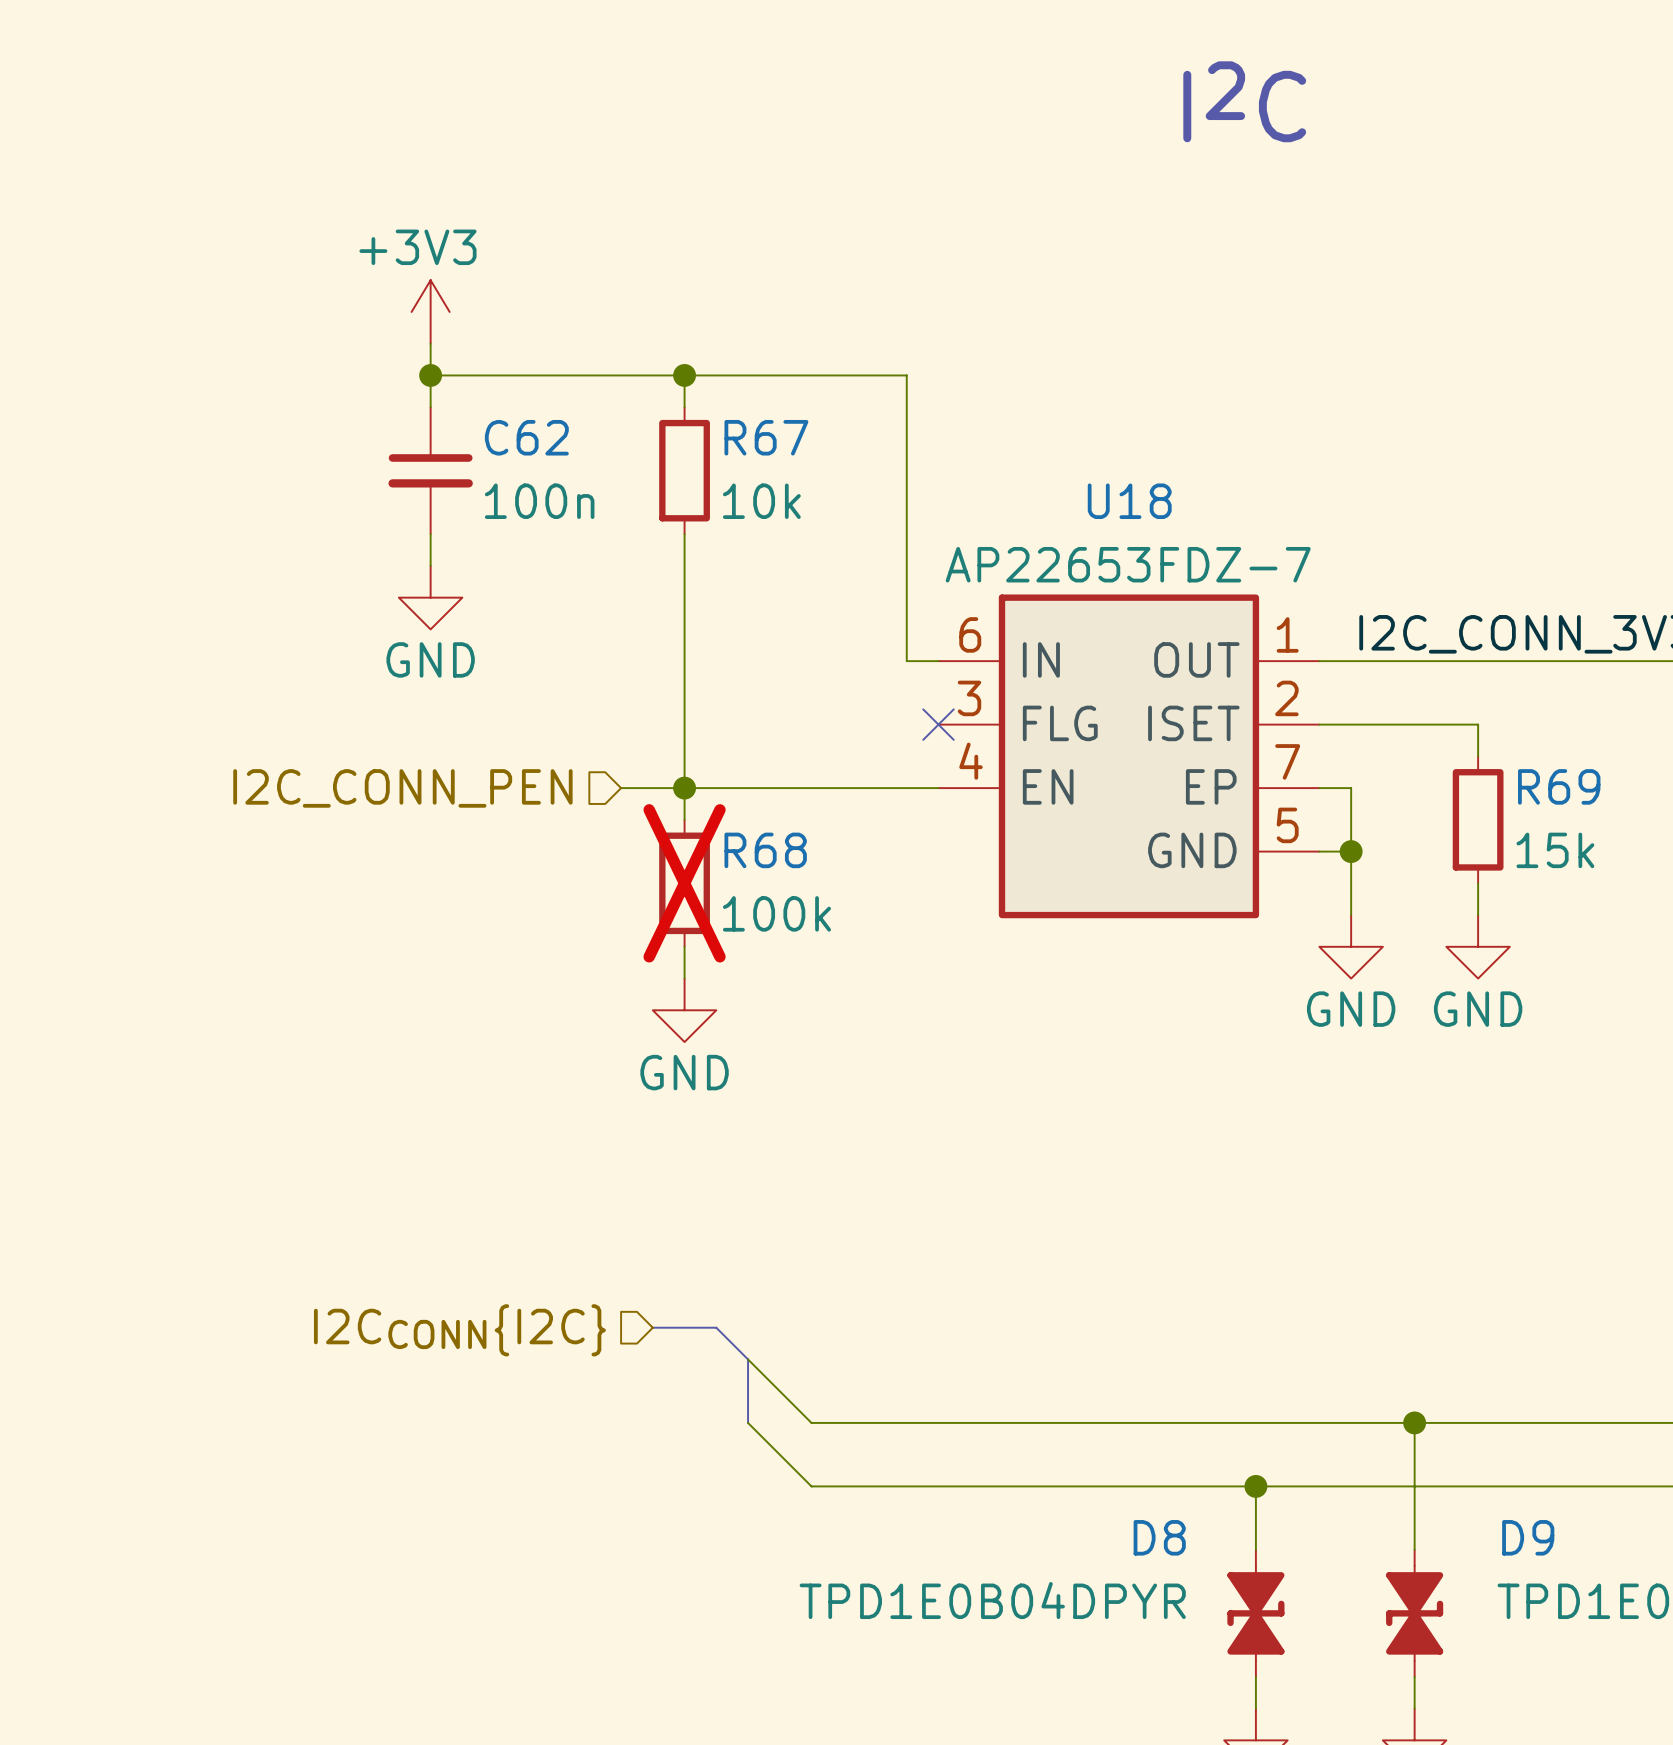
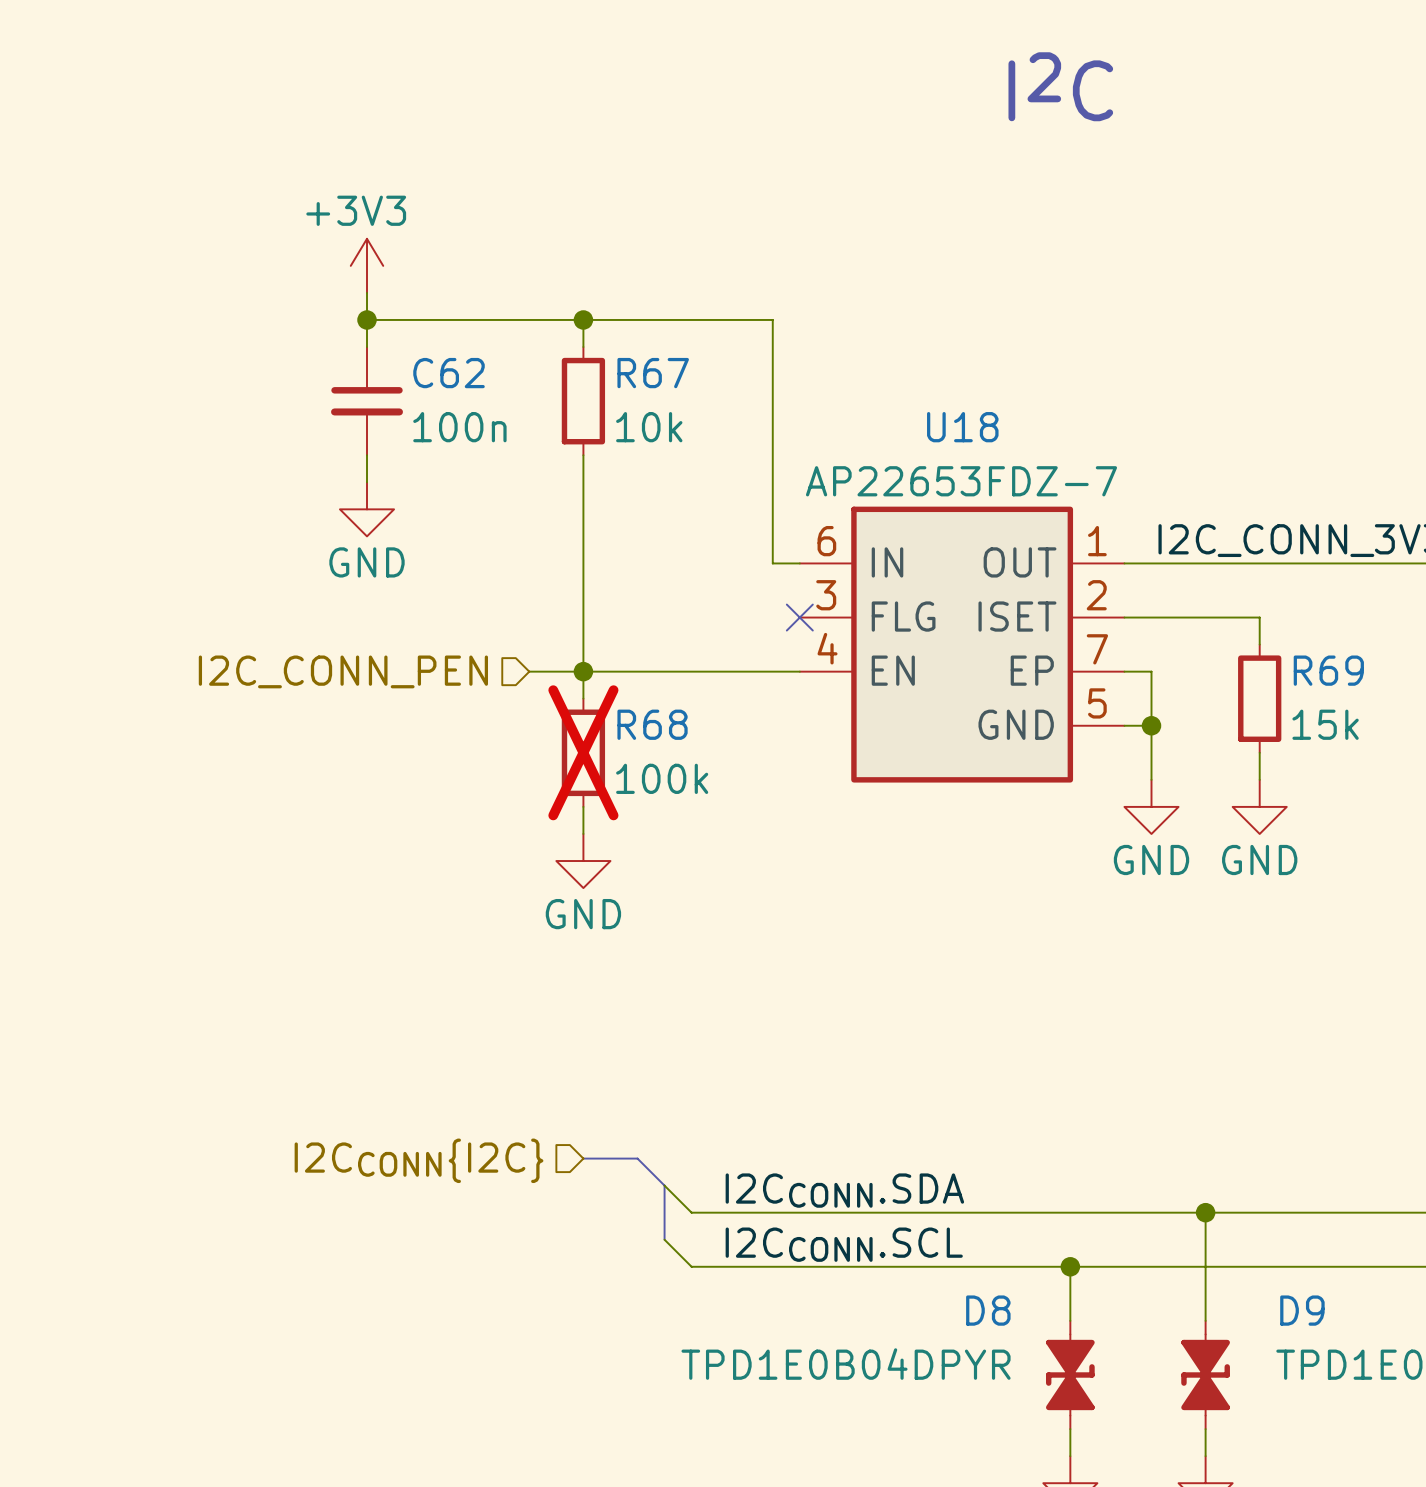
bus: (652, 1327) (716, 1327) (748, 1359) (748, 1422) -> (583, 1158) (637, 1158) (664, 1185) (664, 1239)
hierarchical label position: I2CCONN{I2C} (459, 1330) -> I2CCONN{I2C} (419, 1160)
label: none -> I2CCONN.SDA (844, 1190)
wire: (748, 1422) (779, 1454) -> none
label: none -> I2CCONN.SCL (844, 1244)

